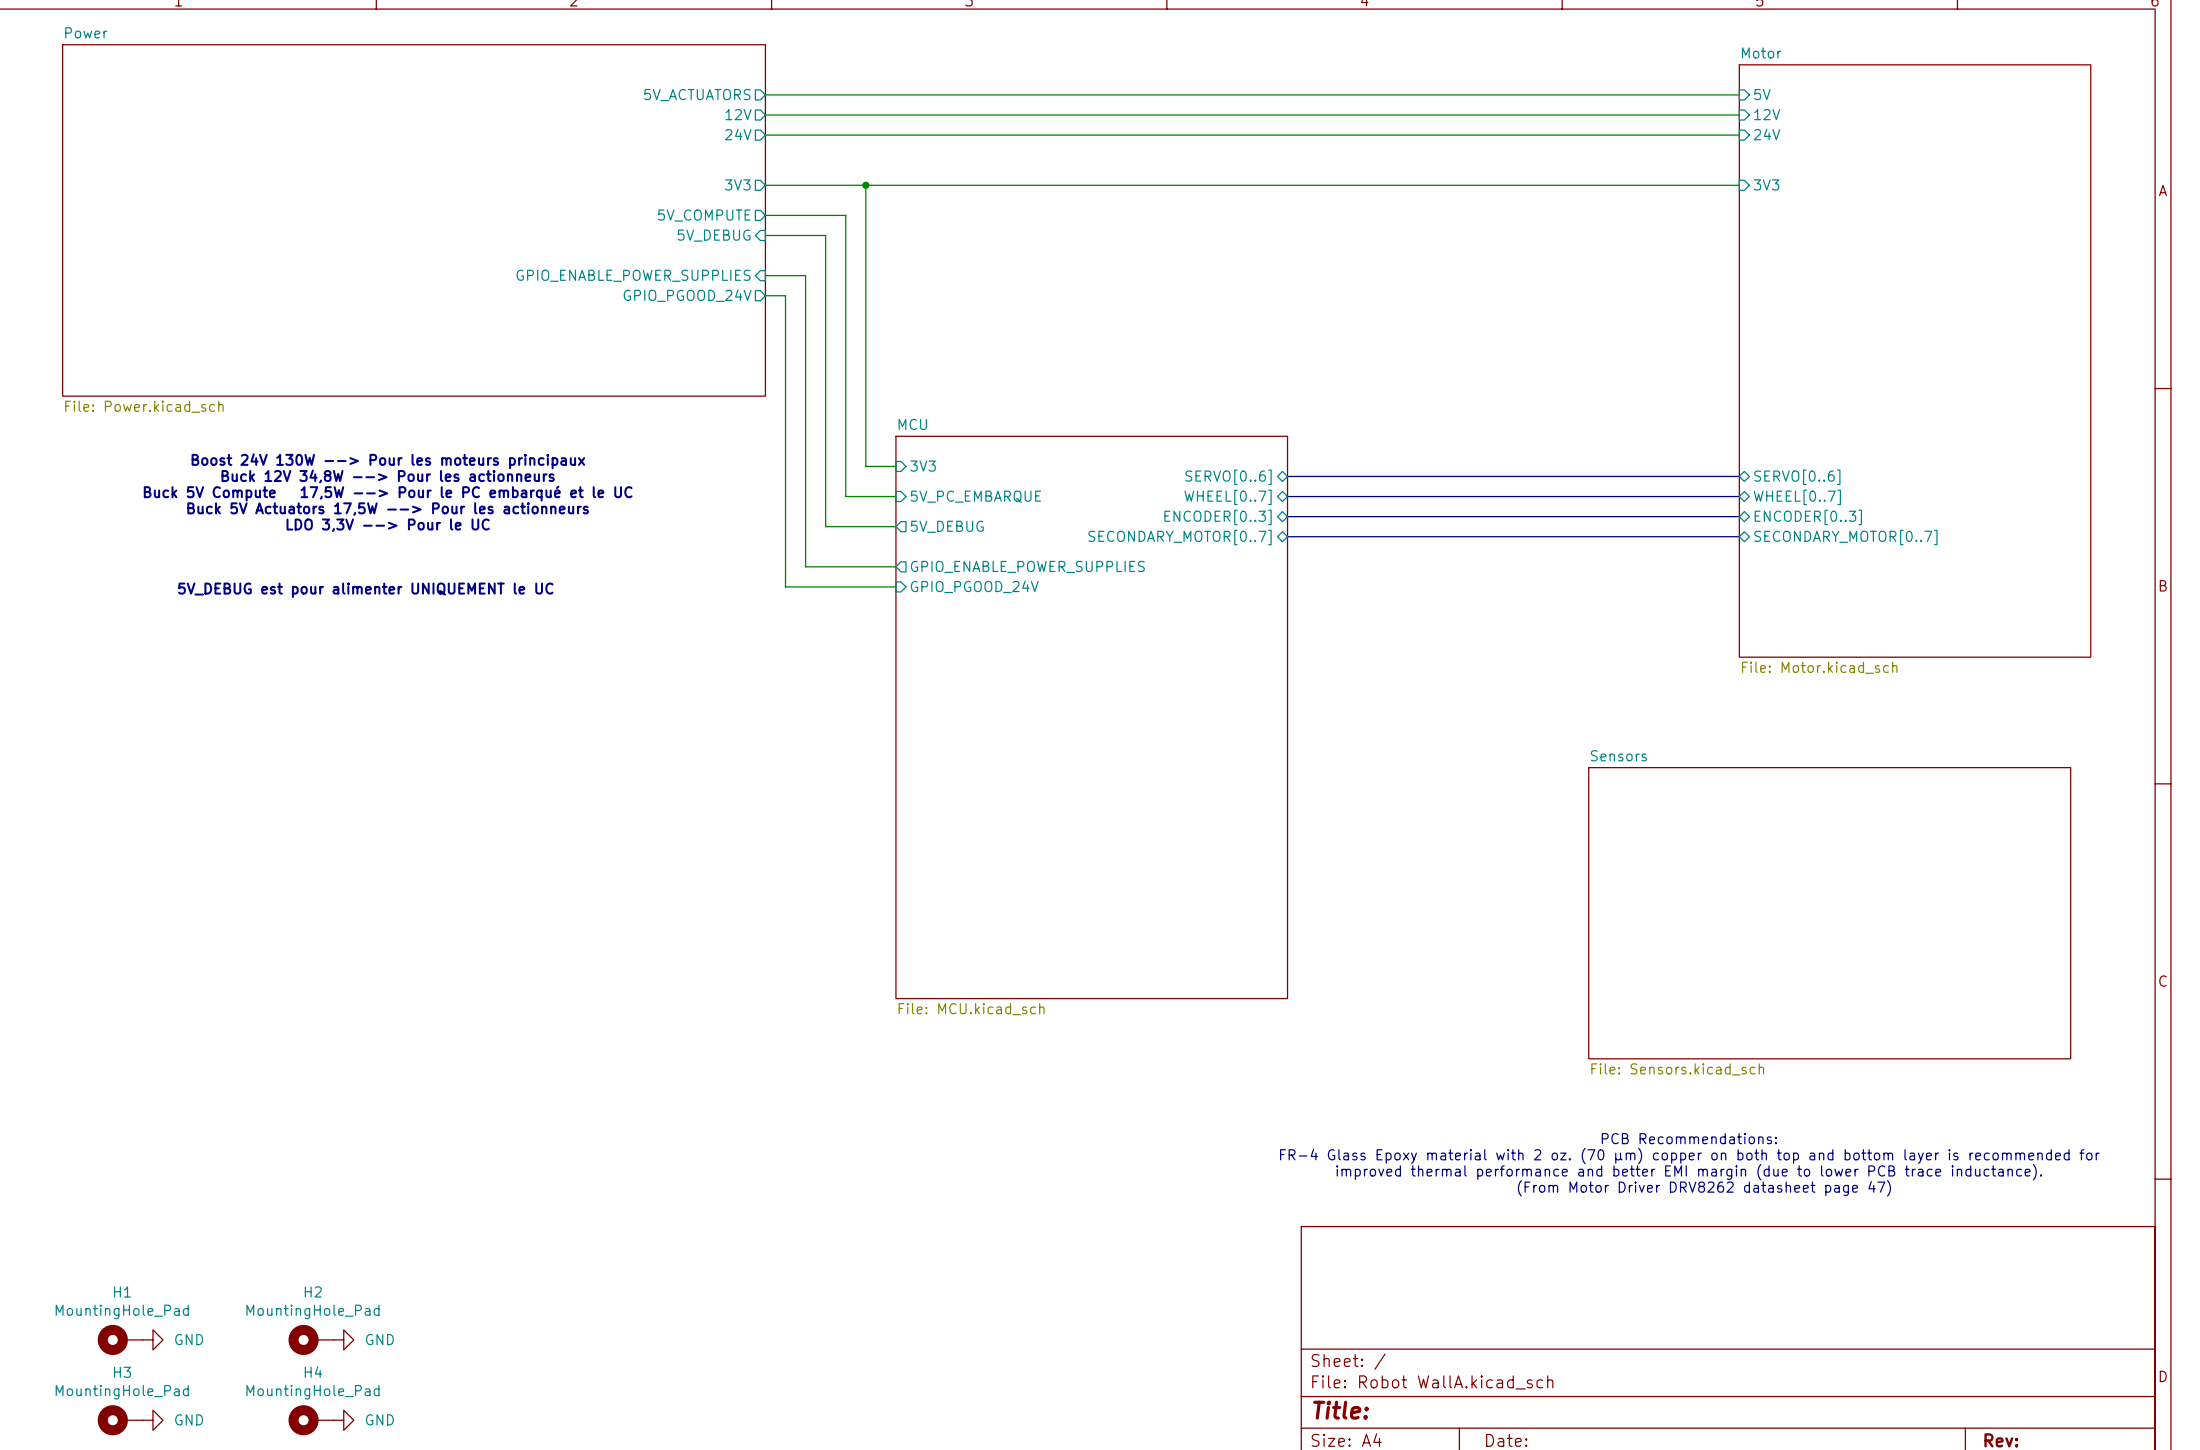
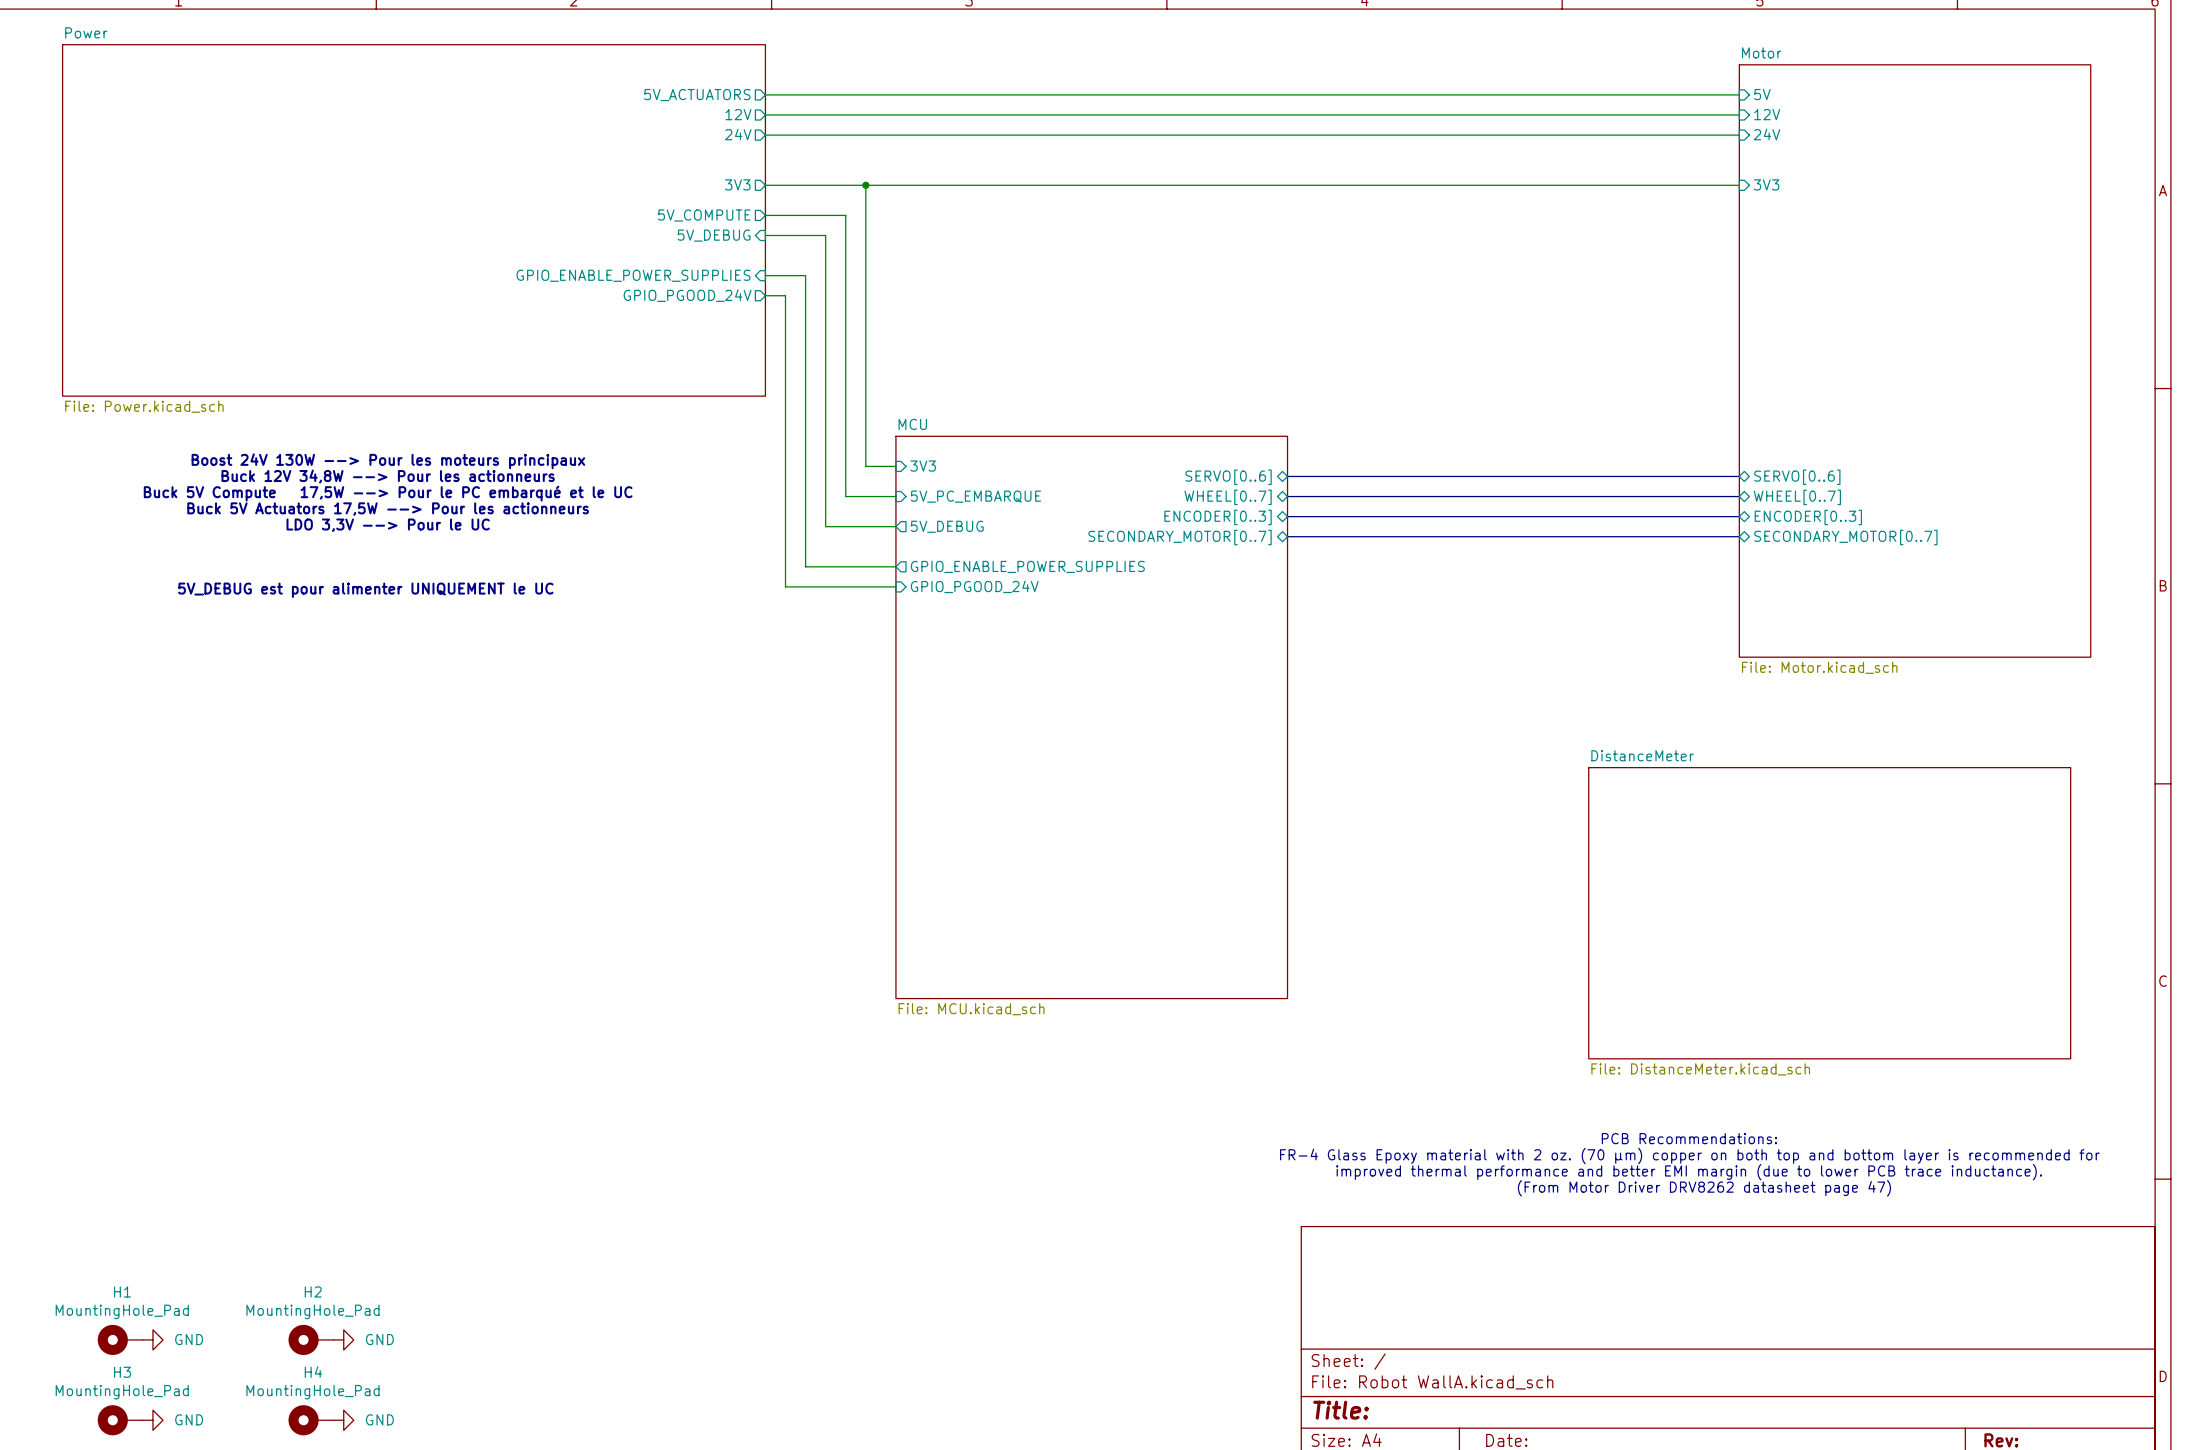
sheet Sensors name: Sensors (1618, 755) -> DistanceMeter (1642, 755)
sheet Sensors value: File: Sensors.kicad_sch (1677, 1069) -> File: DistanceMeter.kicad_sch (1700, 1069)

